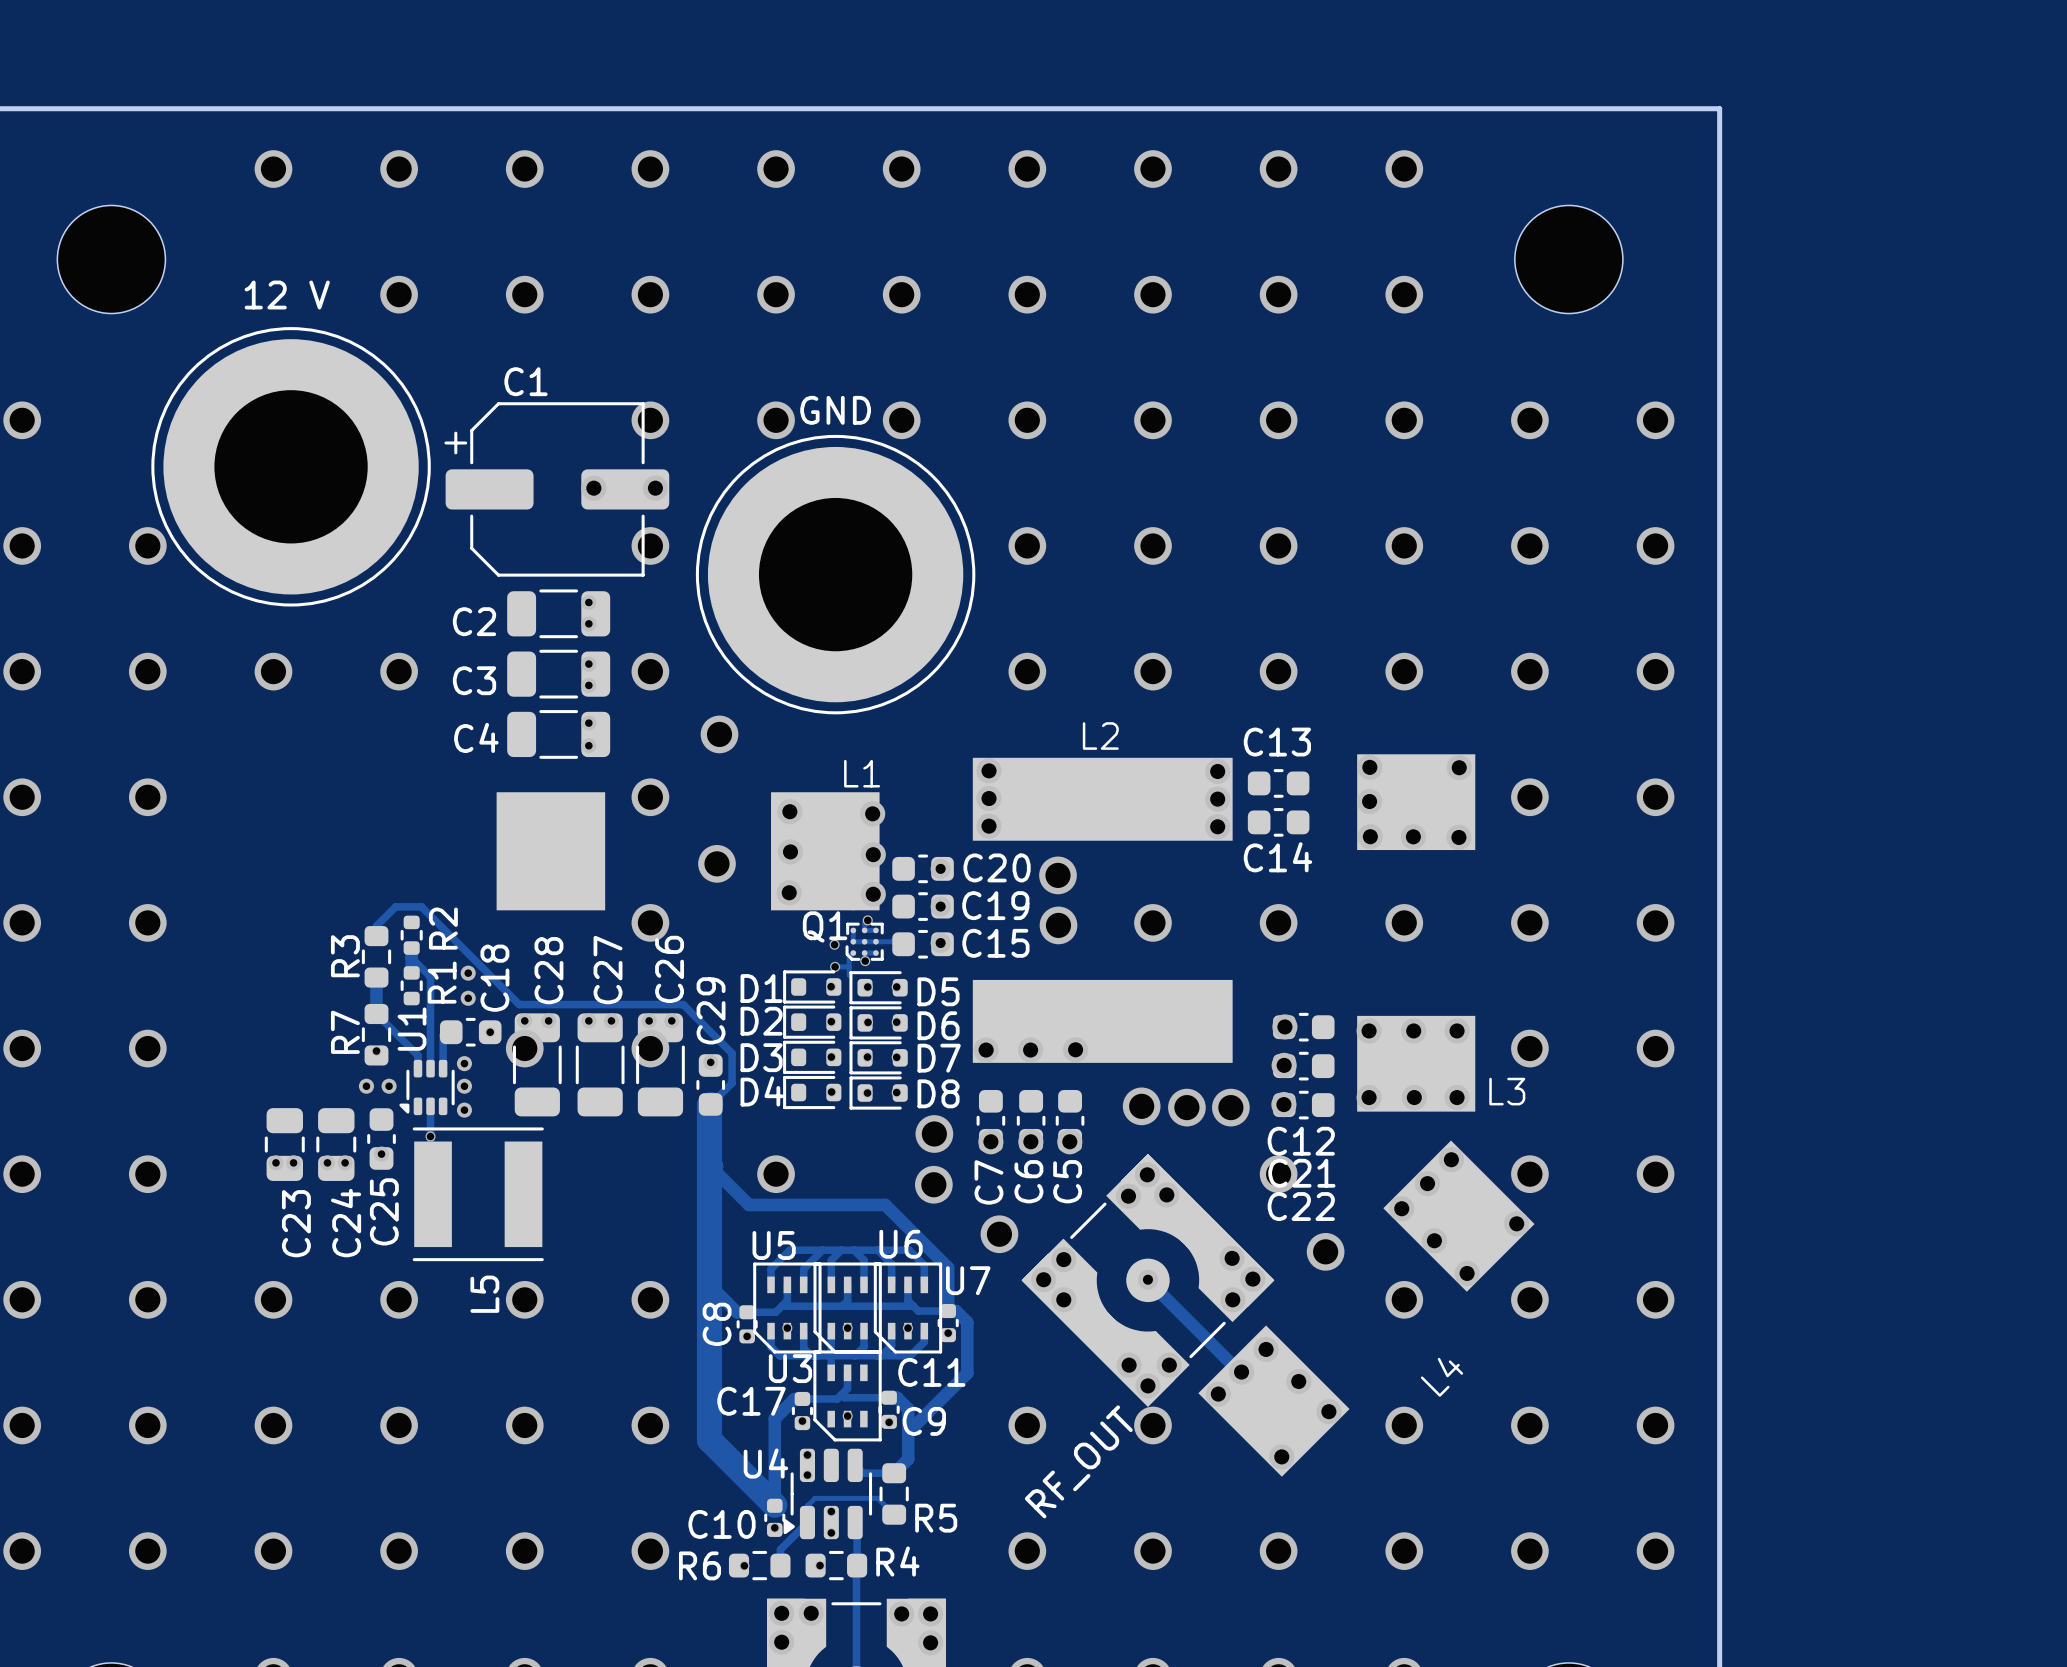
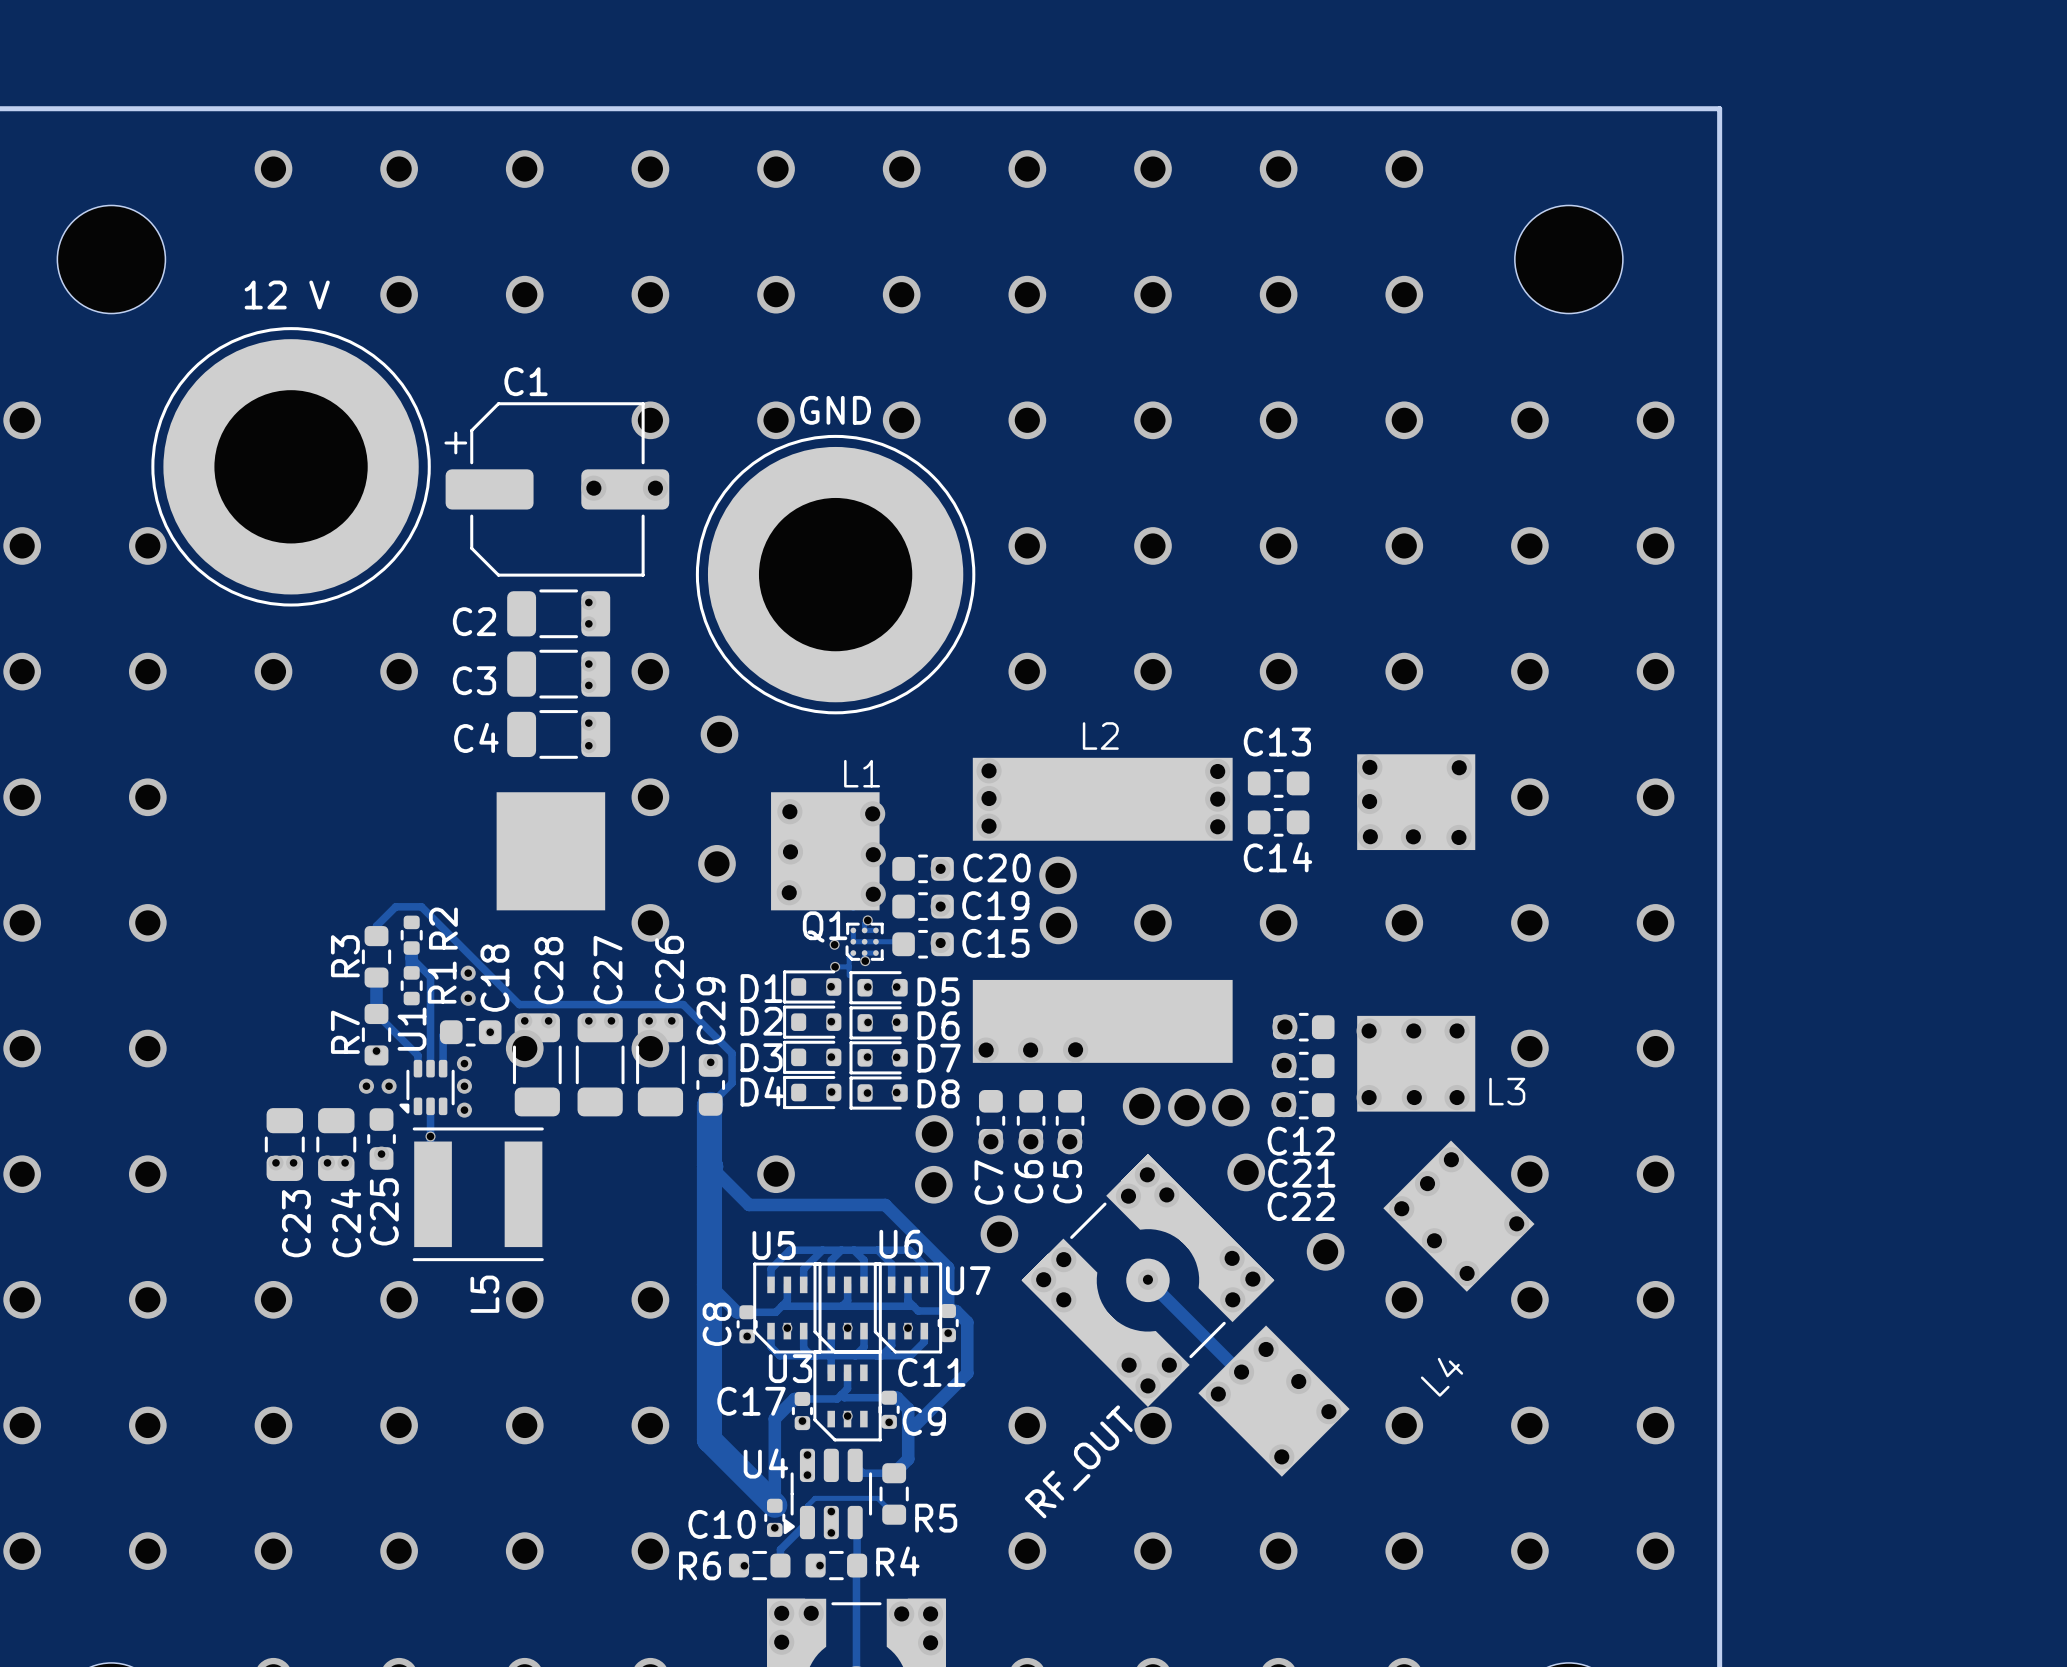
via: (650, 545) -> none
via position: (1278, 1174) -> (1246, 1172)

